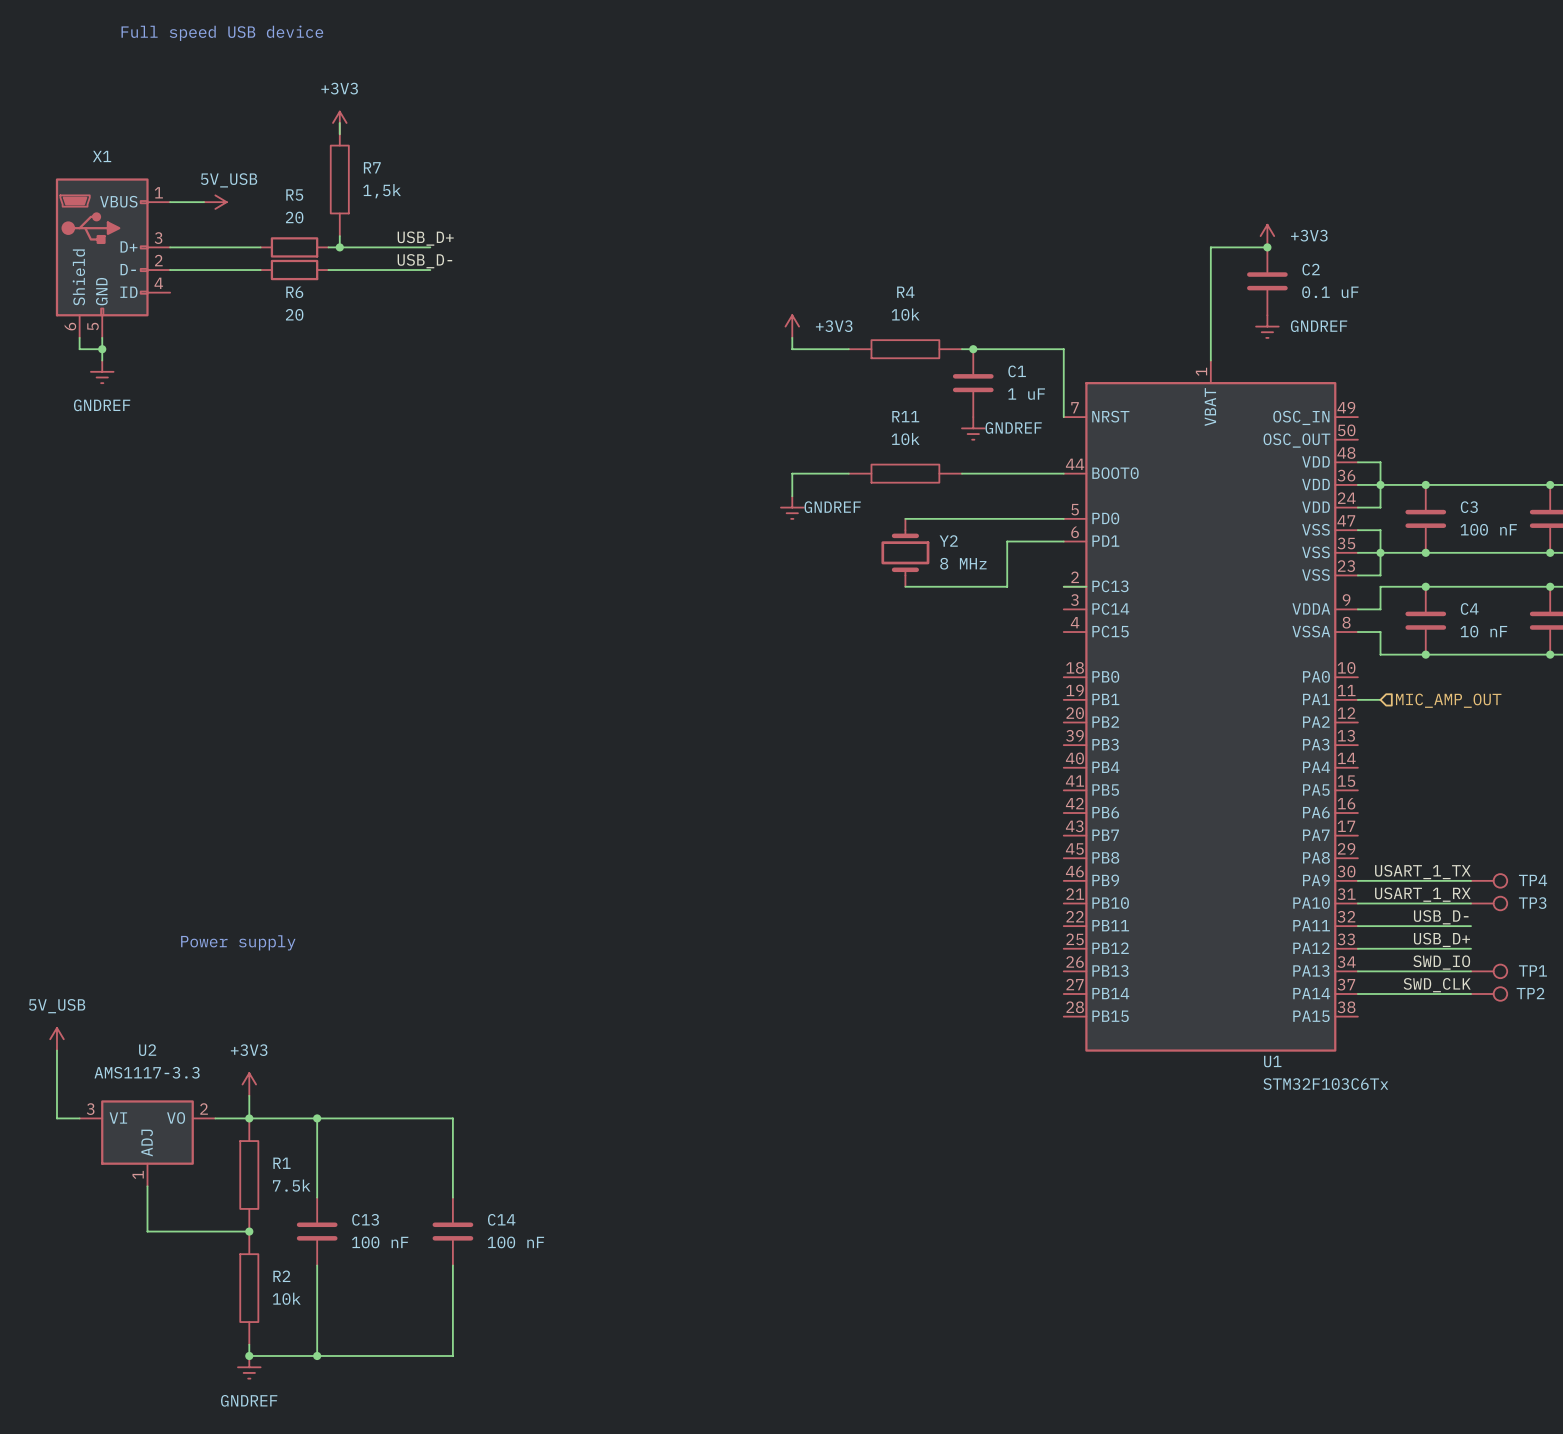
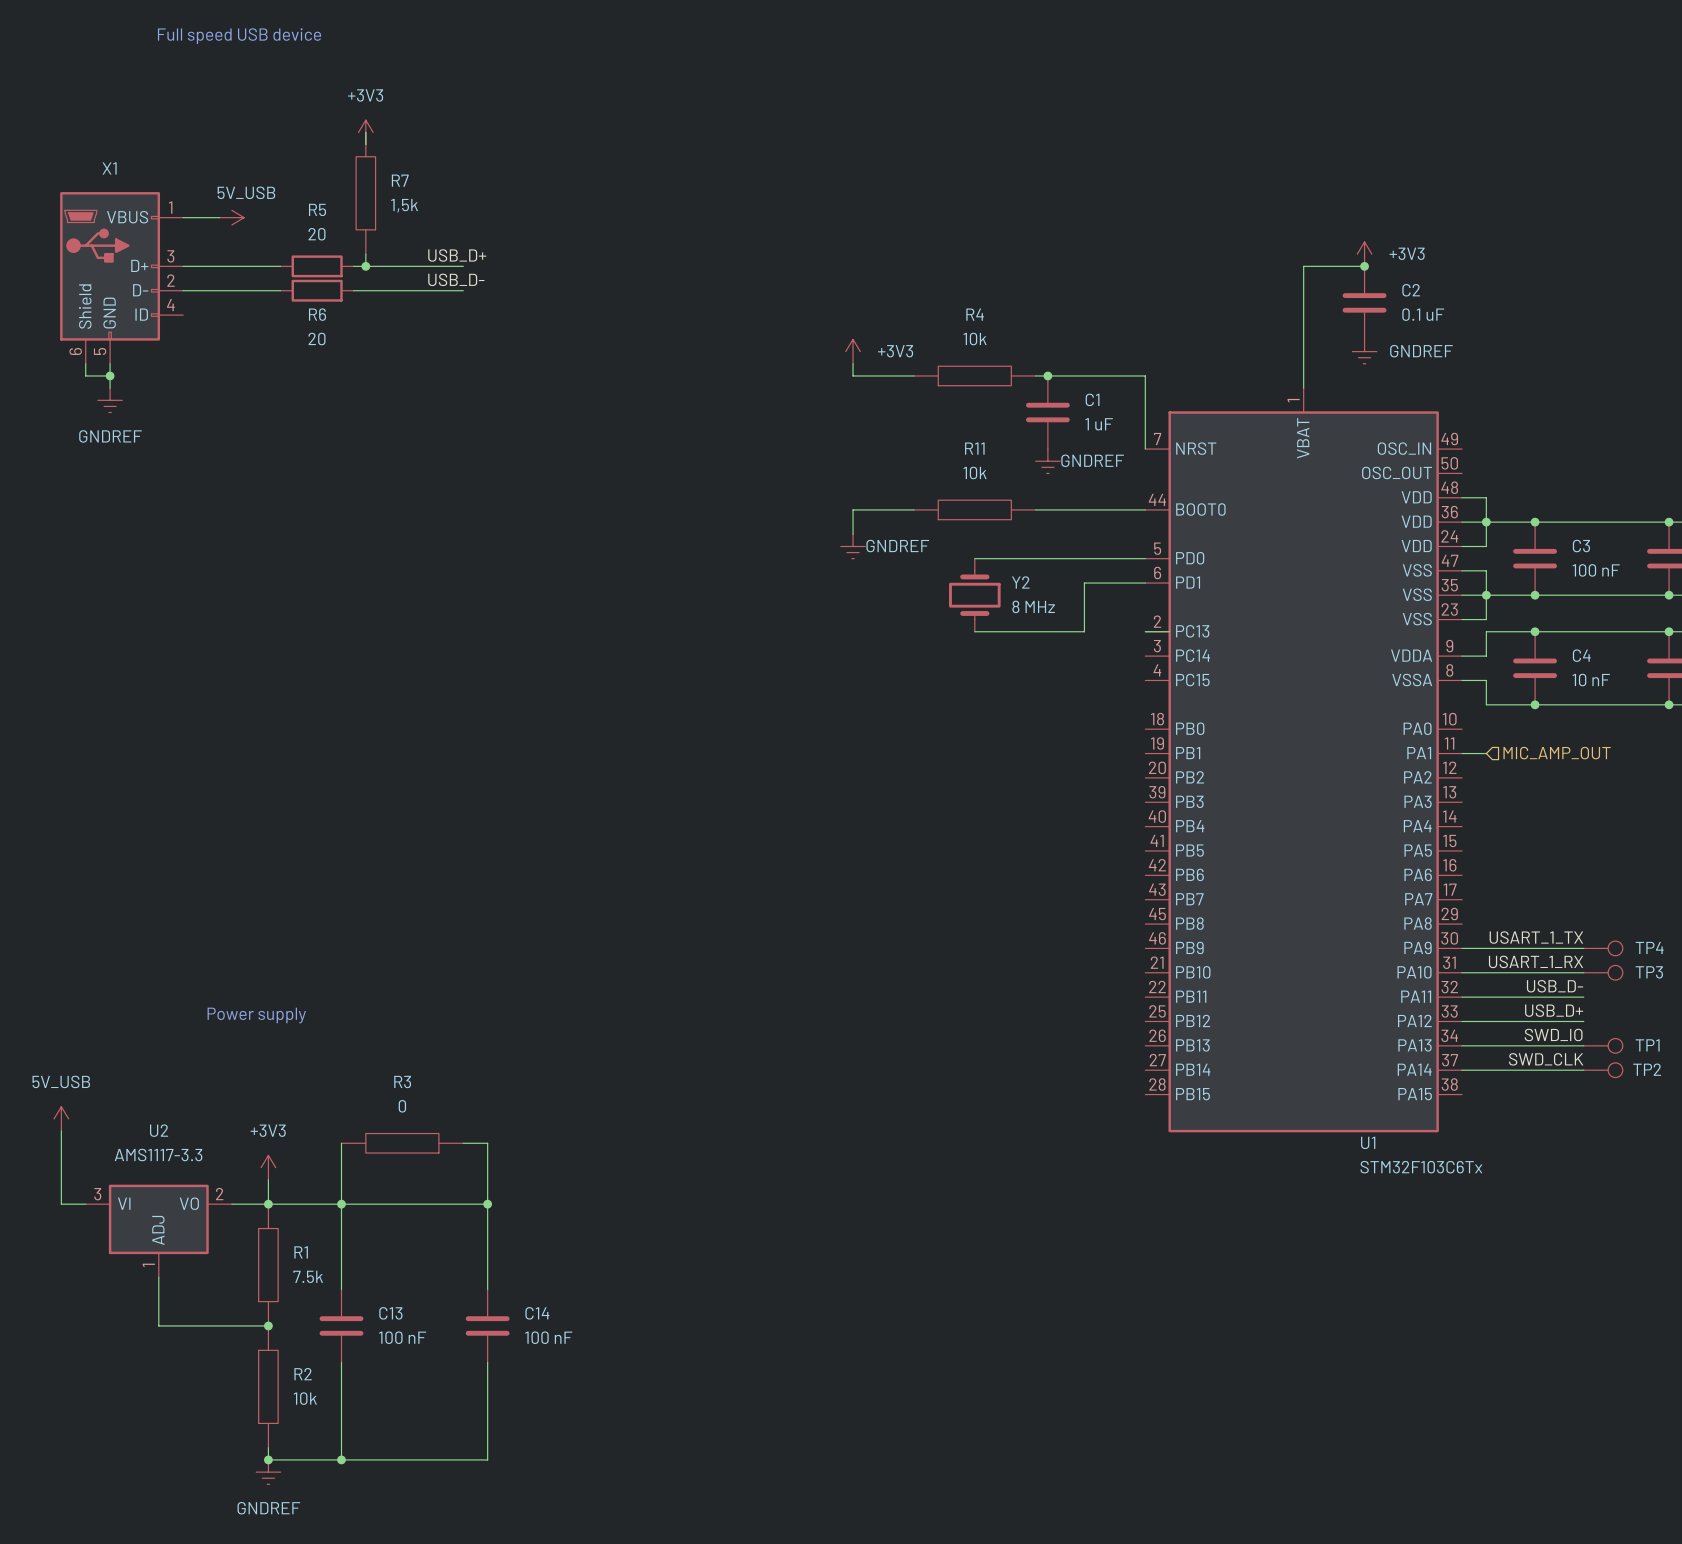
wire: none -> (341, 1143) (341, 1204)
R3: none -> 0 (402, 1143)
wire: none -> (463, 1143) (487, 1143) (487, 1204)
junction: none -> (487, 1204)

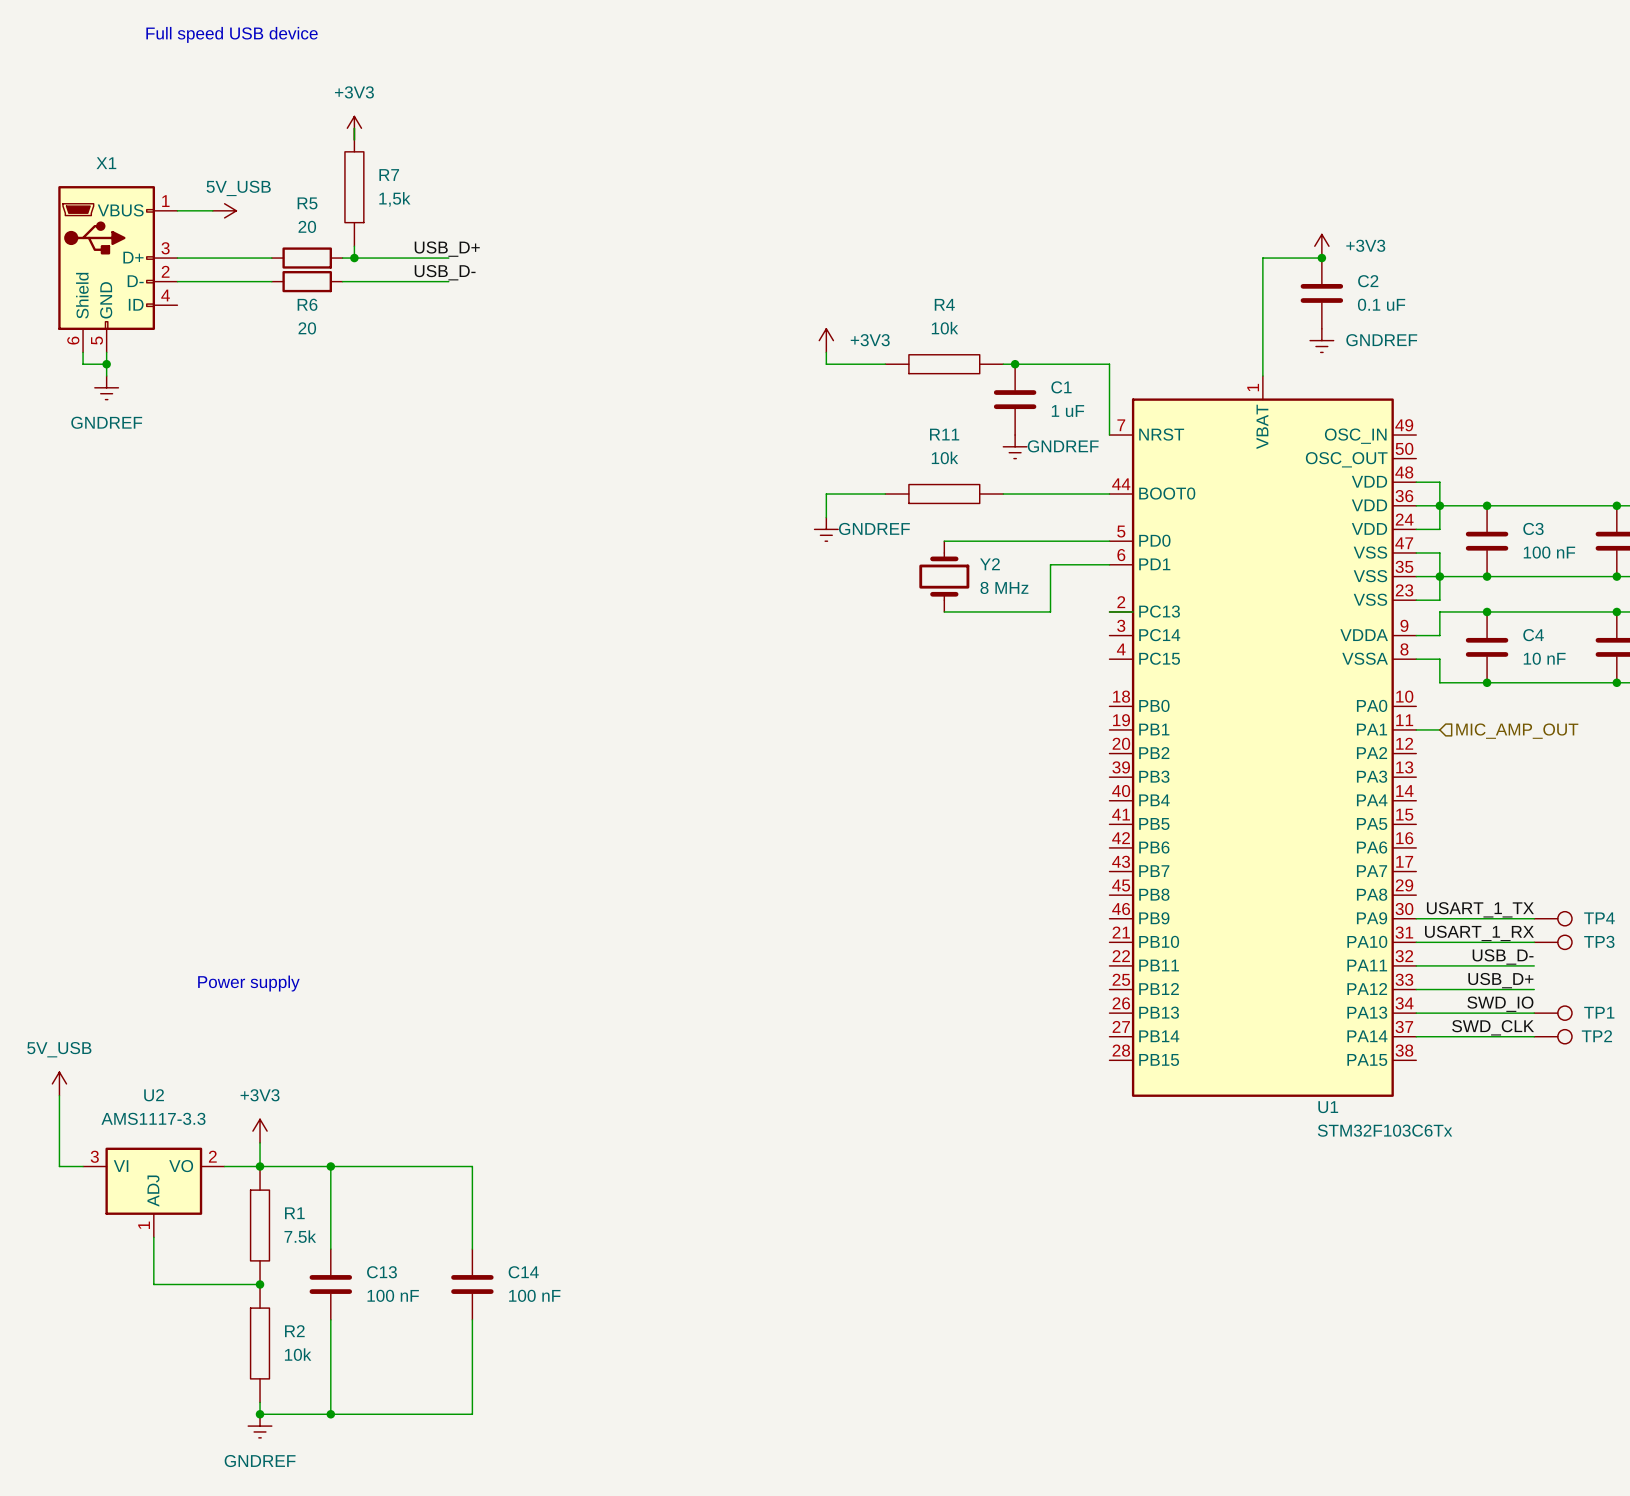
wire: (341, 1143) (341, 1204) -> none
R3: 0 (402, 1143) -> none
wire: (463, 1143) (487, 1143) (487, 1204) -> none
junction: (487, 1204) -> none

